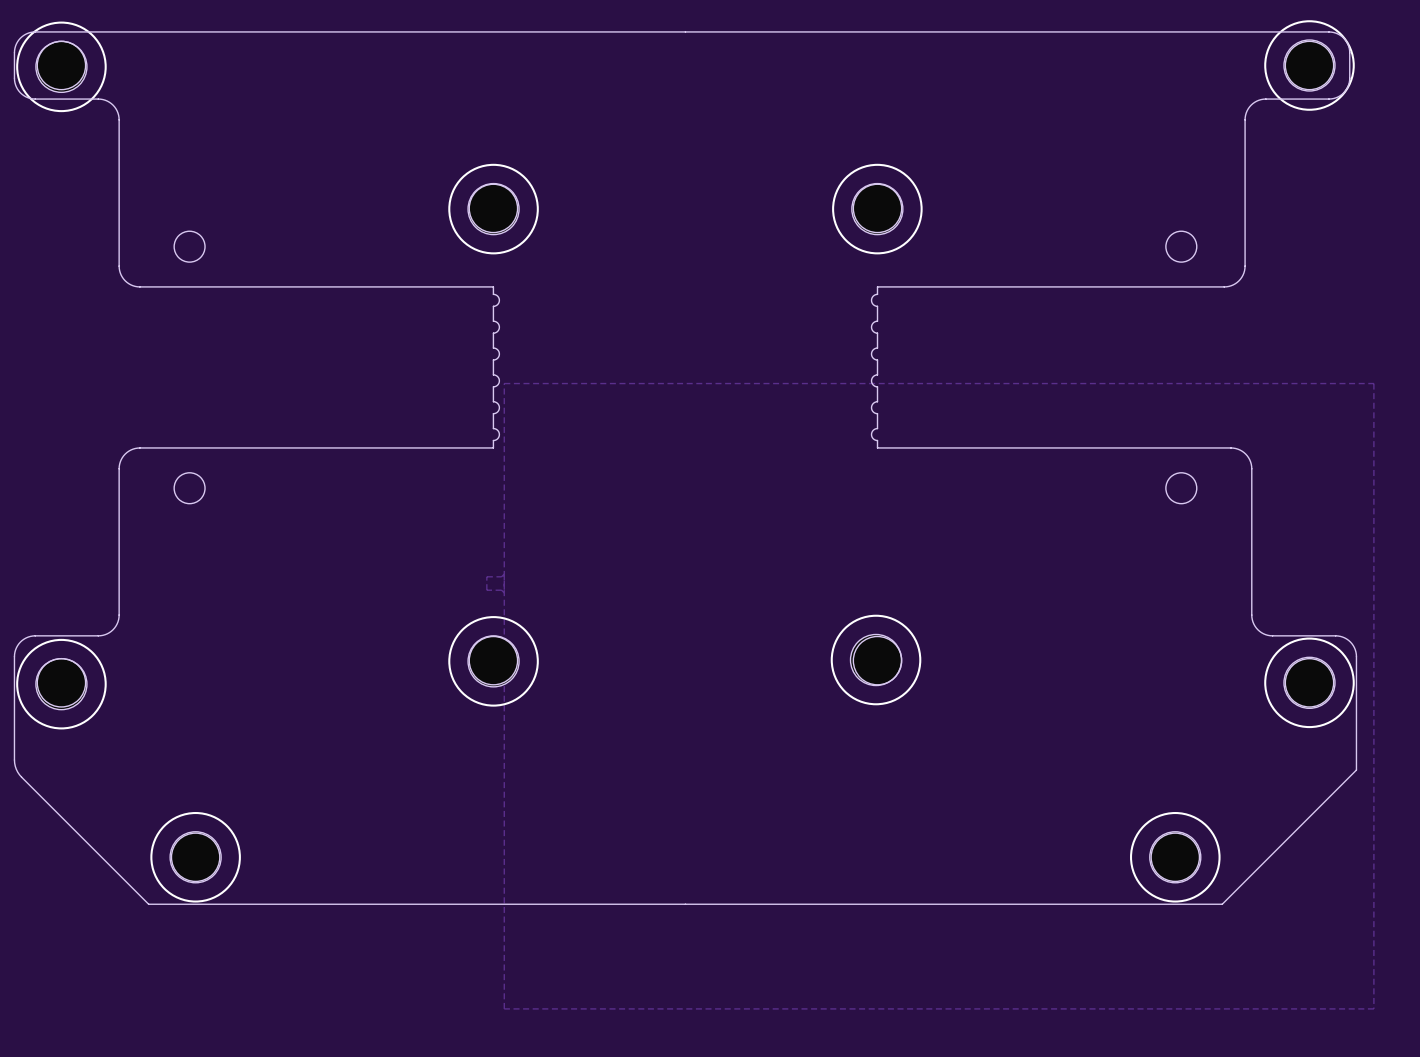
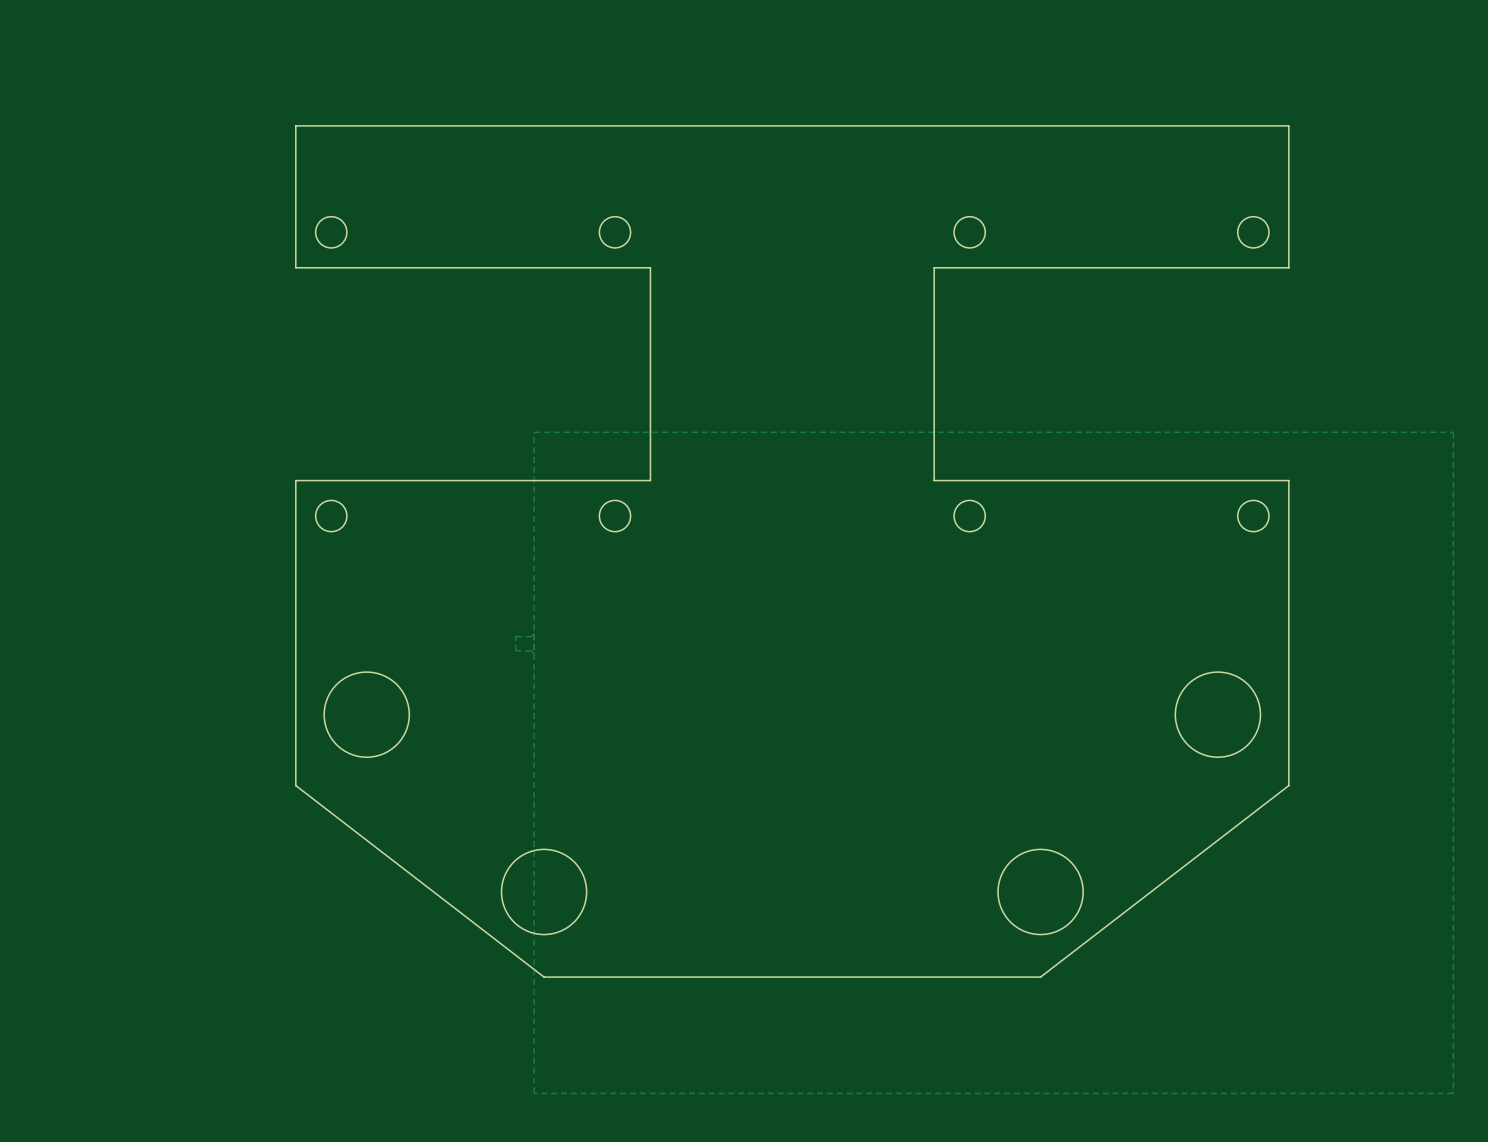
board edge: (35, 31) (1328, 31) (1340, 35) (1347, 43) (1349, 52) (1349, 82) (1341, 94) (1331, 98) (1261, 99) (1252, 103) (1247, 110) (1245, 119) (1244, 268) (1243, 275) (1237, 282) (1224, 286) (877, 286) (877, 294) (873, 296) (871, 300) (873, 304) (877, 306) (877, 321) (873, 322) (871, 327) (873, 331) (877, 333) (877, 348) (873, 350) (871, 354) (873, 357) (877, 359) (877, 374) (873, 376) (871, 380) (873, 385) (877, 386) (877, 401) (873, 403) (871, 407) (873, 411) (877, 413) (877, 428) (873, 430) (871, 434) (873, 438) (877, 440) (877, 447) (1230, 447) (1242, 451) (1248, 457) (1251, 466) (1252, 621) (1259, 631) (1267, 635) (1337, 635) (1346, 639) (1353, 645) (1356, 656) (1356, 770) (1222, 904) (148, 904) (21, 777) (16, 769) (14, 760) (14, 656) (19, 643) (26, 637) (32, 635) (102, 635) (111, 631) (117, 621) (119, 468) (122, 457) (128, 451) (139, 447) (493, 447) (493, 440) (497, 438) (499, 434) (497, 430) (493, 428) (493, 413) (497, 411) (499, 407) (497, 403) (493, 401) (493, 386) (497, 384) (499, 380) (497, 376) (493, 374) (493, 359) (497, 358) (499, 354) (497, 350) (493, 348) (493, 333) (497, 331) (499, 327) (497, 322) (493, 321) (493, 306) (498, 303) (499, 299) (493, 294) (493, 286) (139, 286) (128, 283) (122, 277) (119, 268) (117, 112) (113, 105) (102, 99) (32, 98) (20, 92) (14, 80) (14, 48) (22, 36) (35, 31) -> (295, 125) (295, 267) (650, 267) (650, 480) (295, 480) (295, 785) (544, 977) (1040, 977) (1288, 785) (1288, 480) (934, 480) (934, 267) (1288, 267) (1288, 125) (295, 125)
round board edge: [36, 40, 87, 91] -> none
round board edge: [1284, 40, 1335, 91] -> none
part: (1309, 65) -> none
part: (61, 66) -> none
round board edge: none -> [314, 216, 348, 249]
round board edge: none -> [598, 216, 632, 249]
round board edge: none -> [953, 216, 986, 249]
round board edge: none -> [1237, 216, 1270, 249]
round board edge: [468, 183, 519, 234] -> none
round board edge: [852, 183, 903, 234] -> none
part: (493, 209) -> none
part: (877, 209) -> none
round board edge: [173, 230, 206, 263] -> none
round board edge: [1165, 230, 1198, 263] -> none
round board edge: none -> [314, 499, 348, 533]
round board edge: none -> [598, 499, 632, 533]
round board edge: none -> [953, 499, 986, 533]
round board edge: none -> [1237, 499, 1270, 533]
round board edge: [173, 472, 206, 505] -> none
round board edge: [1165, 472, 1198, 505] -> none
round board edge: none -> [323, 671, 411, 758]
round board edge: none -> [1174, 671, 1262, 758]
round board edge: [468, 635, 519, 686] -> none
round board edge: [852, 635, 903, 686] -> none
round board edge: [36, 657, 87, 708] -> none
round board edge: [1284, 657, 1335, 708] -> none
part: (876, 660) -> none
part: (493, 661) -> none
part: (1309, 682) -> none
part: (61, 684) -> none
round board edge: none -> [500, 848, 588, 936]
round board edge: none -> [997, 848, 1084, 936]
round board edge: [170, 832, 221, 883] -> none
round board edge: [1150, 832, 1201, 883] -> none
part: (195, 857) -> none
part: (1175, 857) -> none

